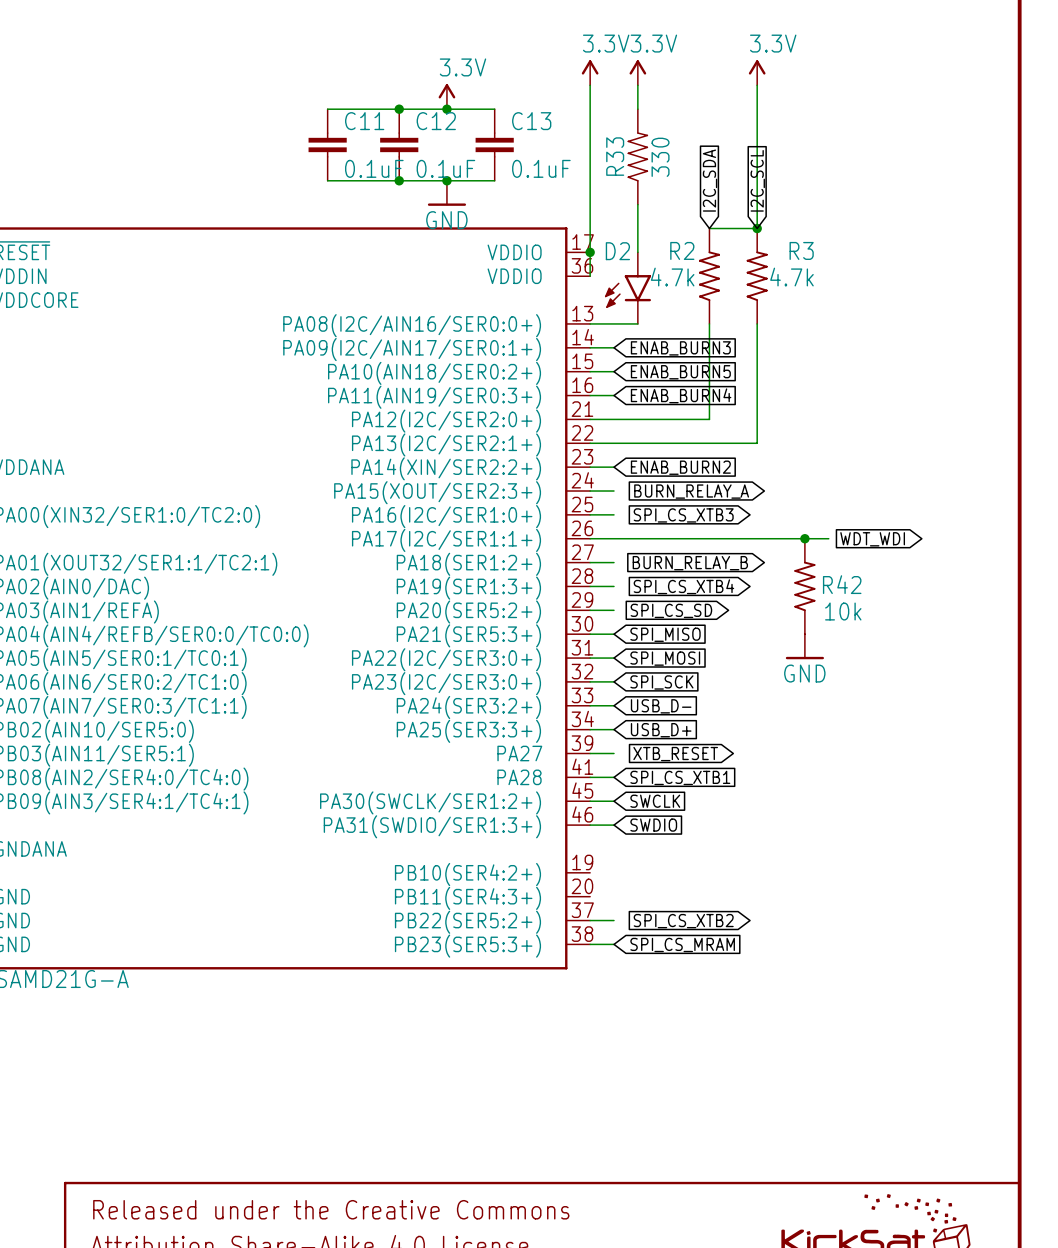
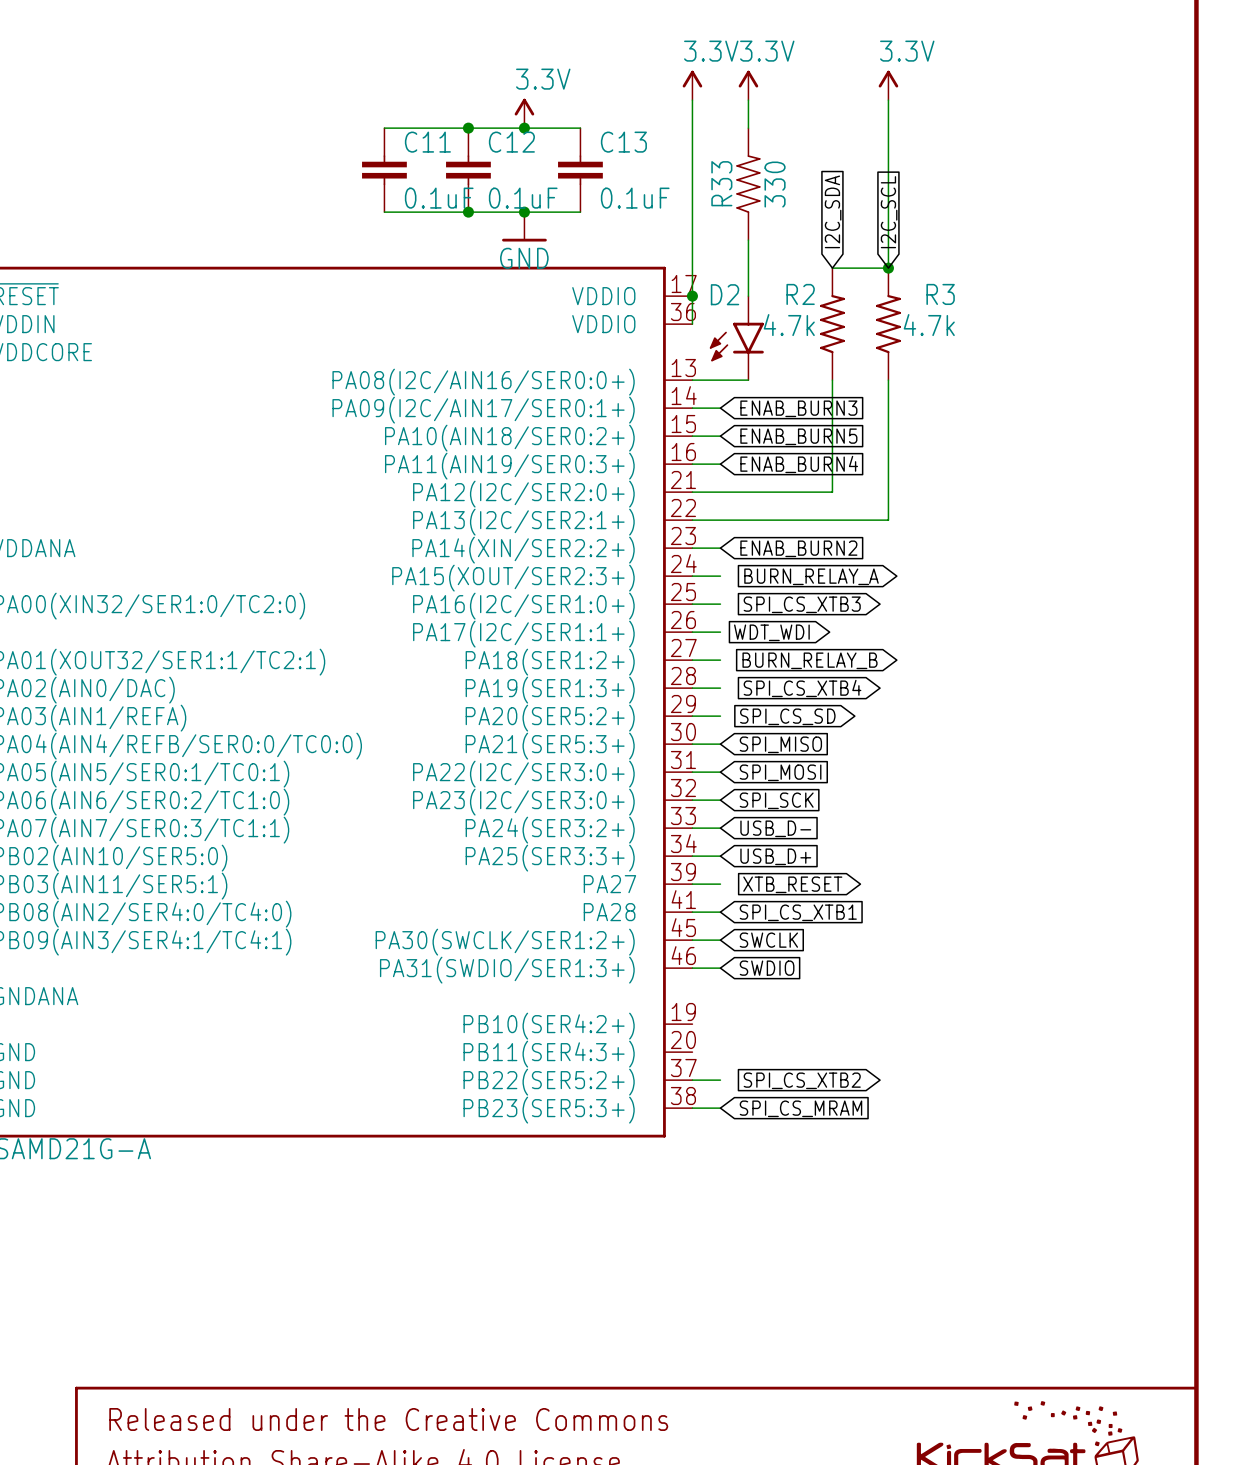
wire: (614, 538) (828, 538) -> none
junction: (804, 538) -> none
global label position: WDT_WDI (872, 539) -> WDT_WDI (771, 632)
R42: 10k (804, 586) -> none
power symbol: GND (804, 646) -> none

